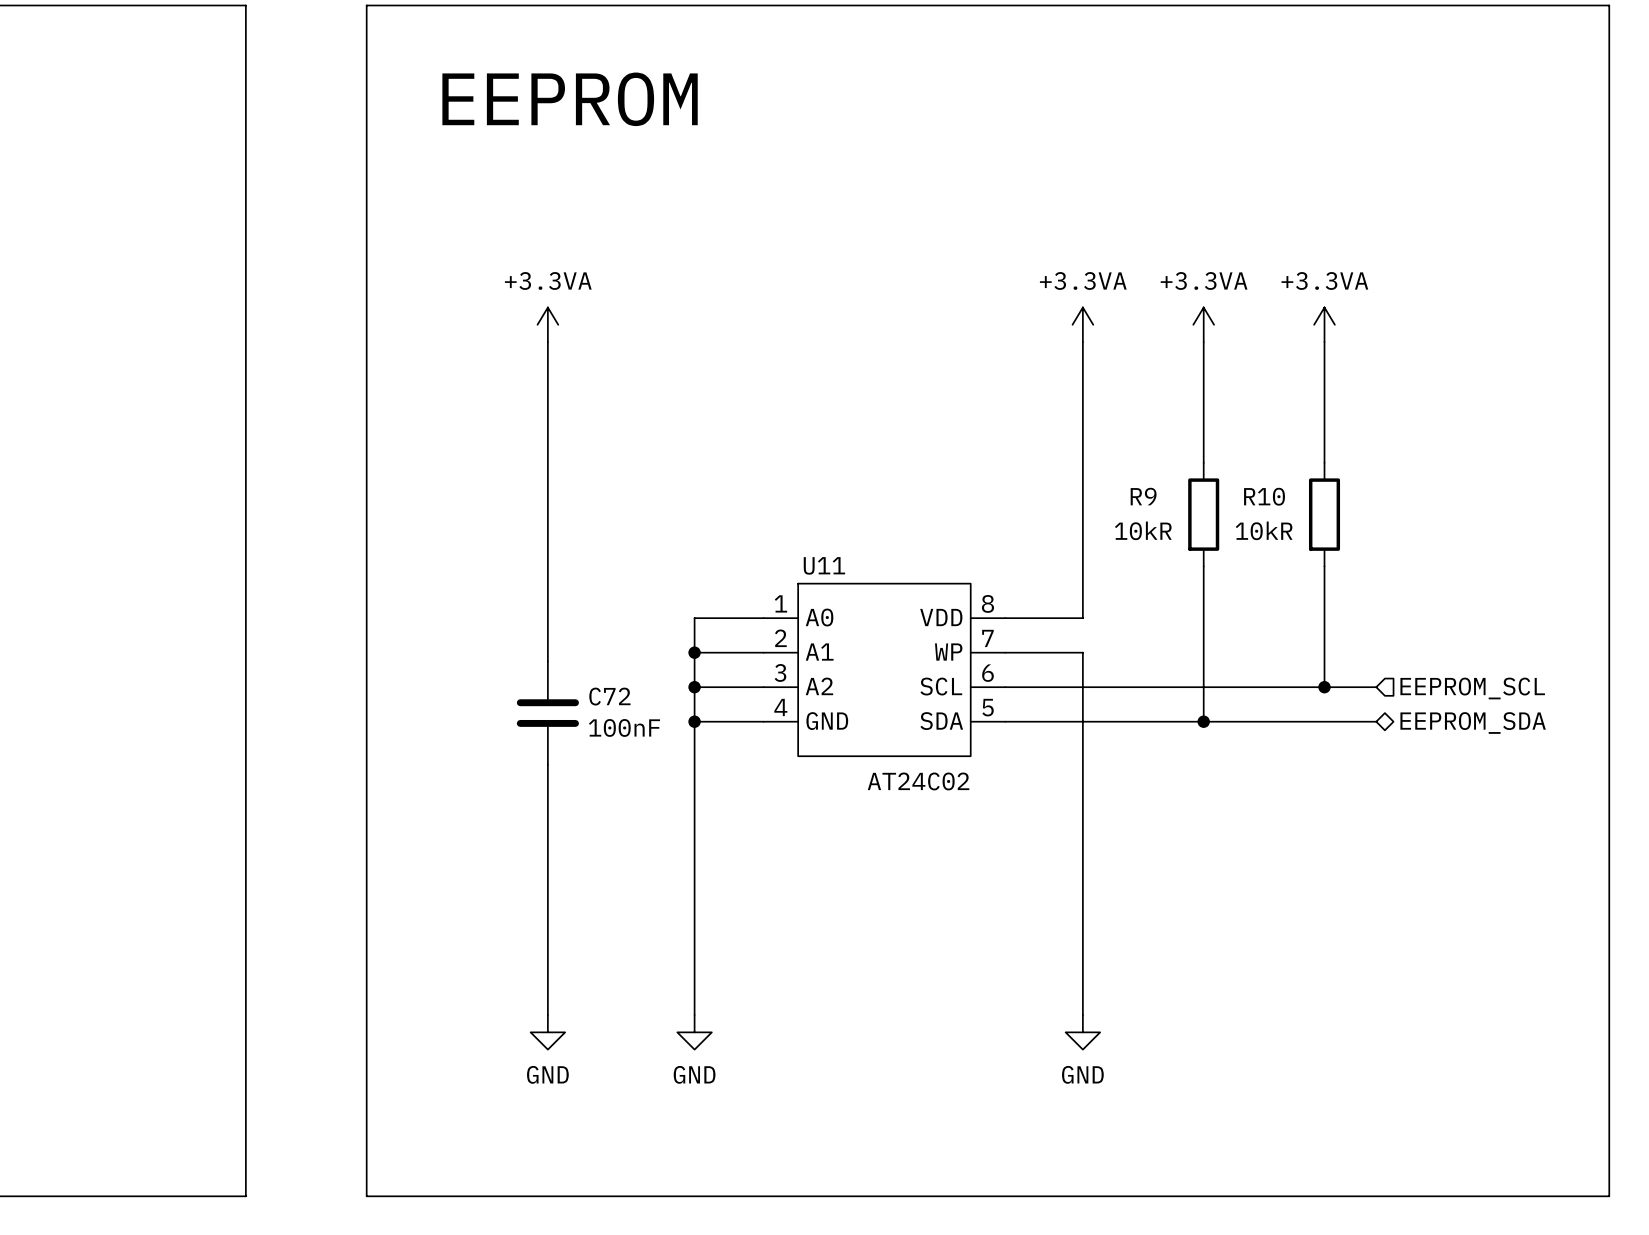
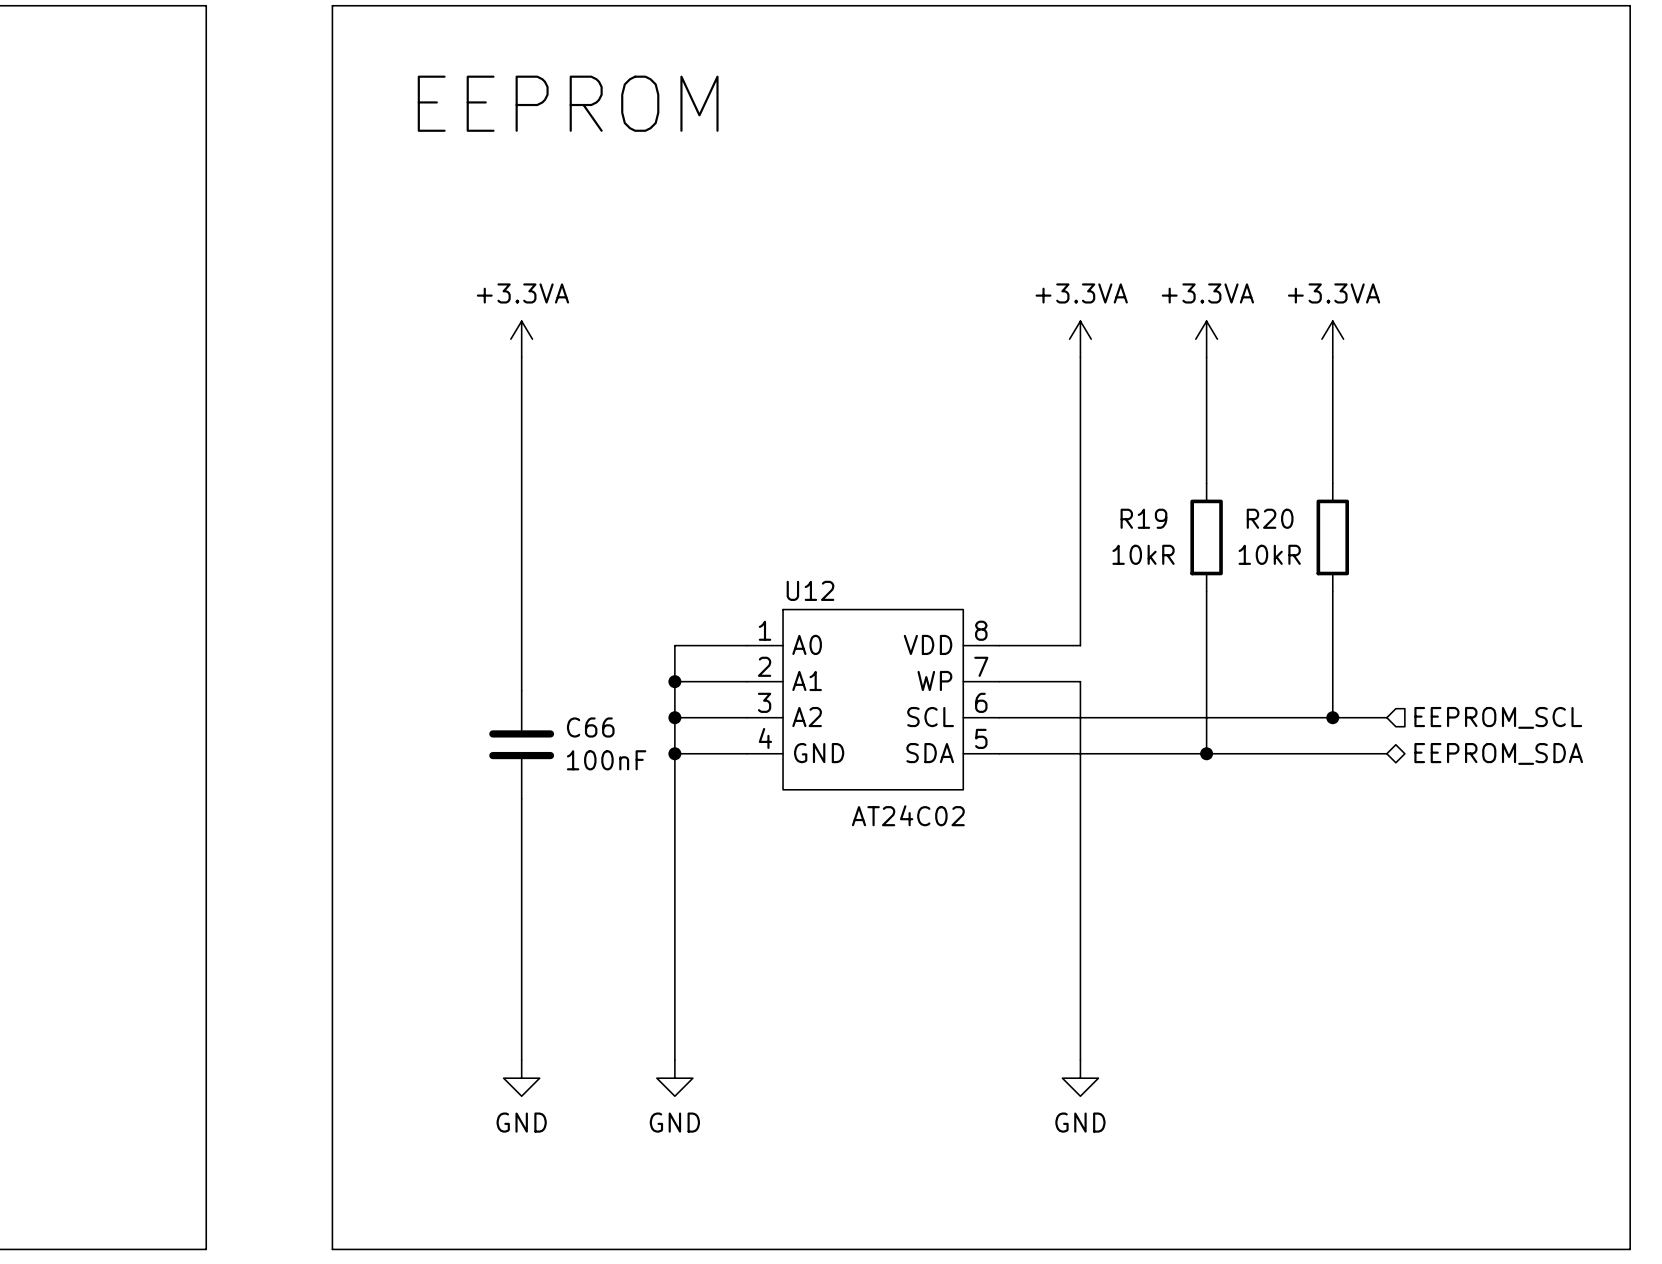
R9 name: R9 (1143, 496) -> R19 (1143, 518)
R10 name: R10 (1264, 496) -> R20 (1270, 518)
U11 name: U11 (824, 565) -> U12 (810, 590)
C72 name: C72 (609, 696) -> C66 (590, 727)

